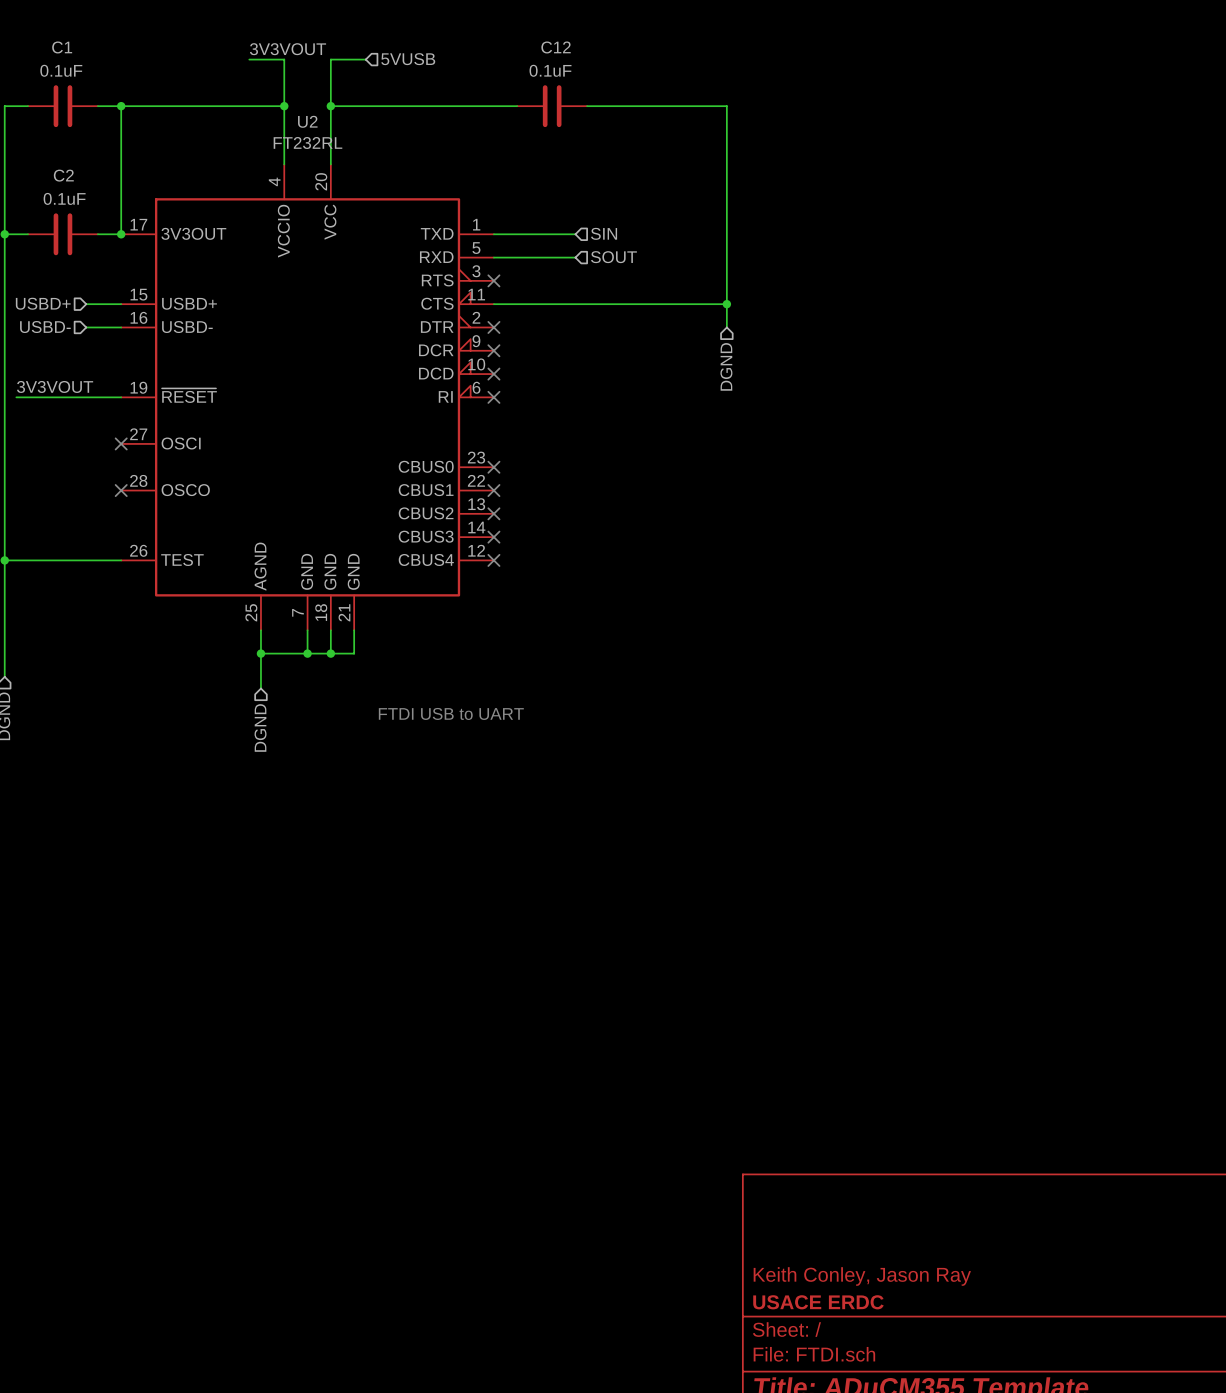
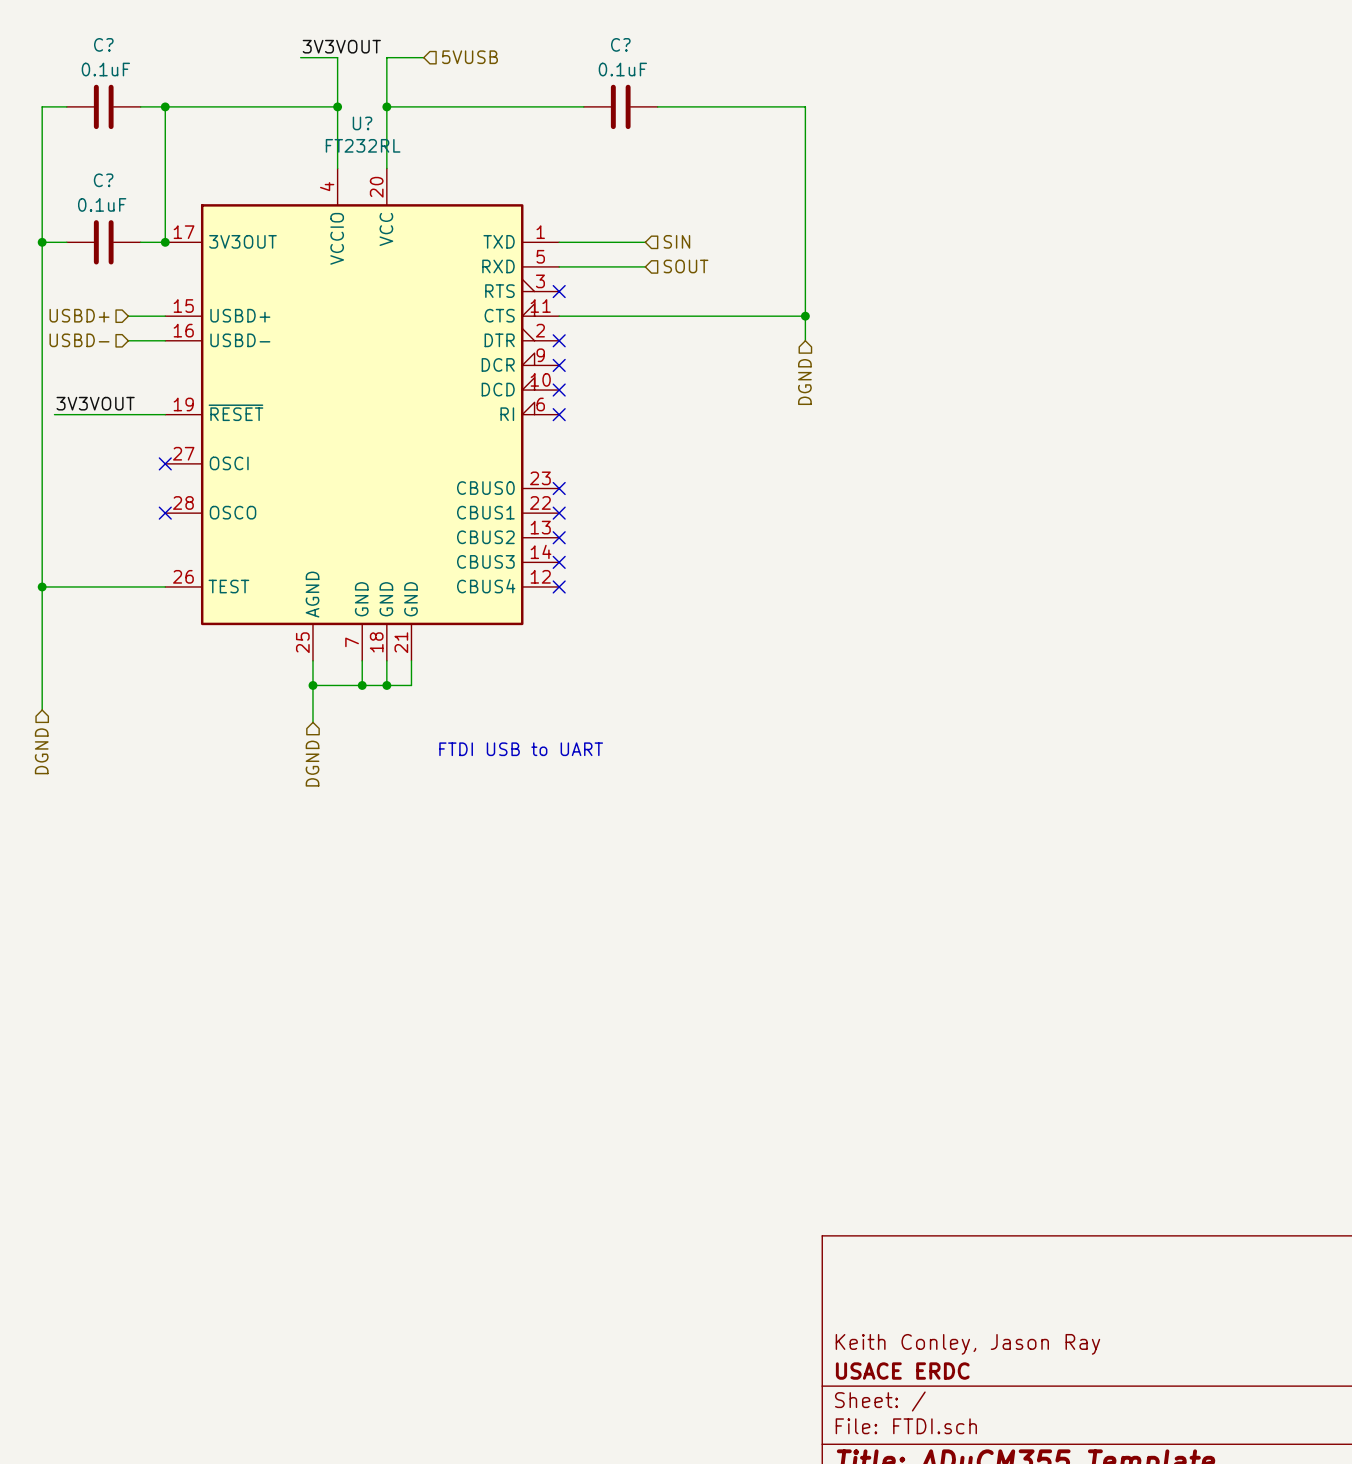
C1 name: C1 (62, 47) -> C? (103, 44)
C12 name: C12 (556, 47) -> C? (620, 44)
U2 name: U2 (307, 121) -> U? (362, 123)
C2 name: C2 (63, 175) -> C? (103, 180)

